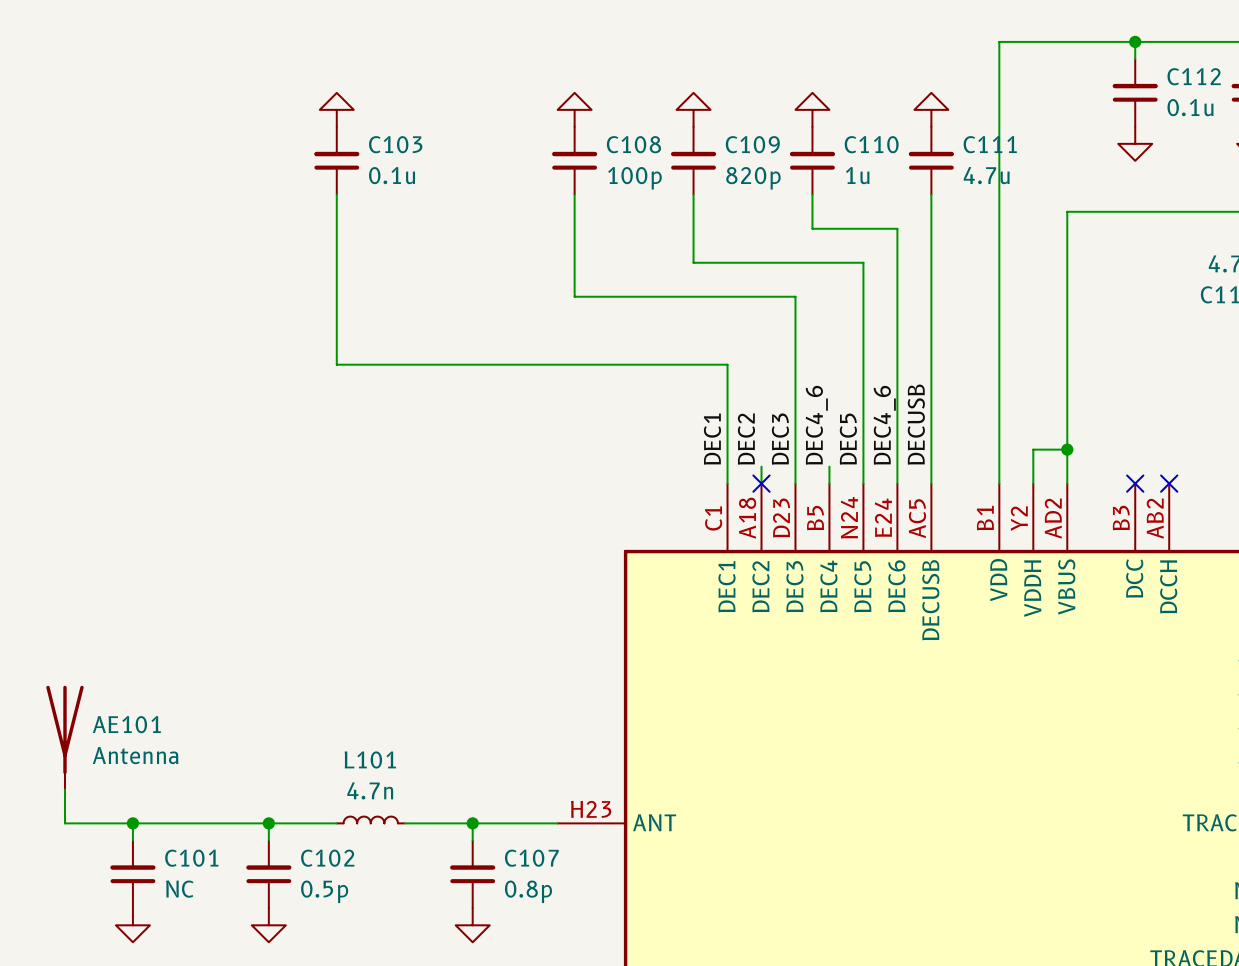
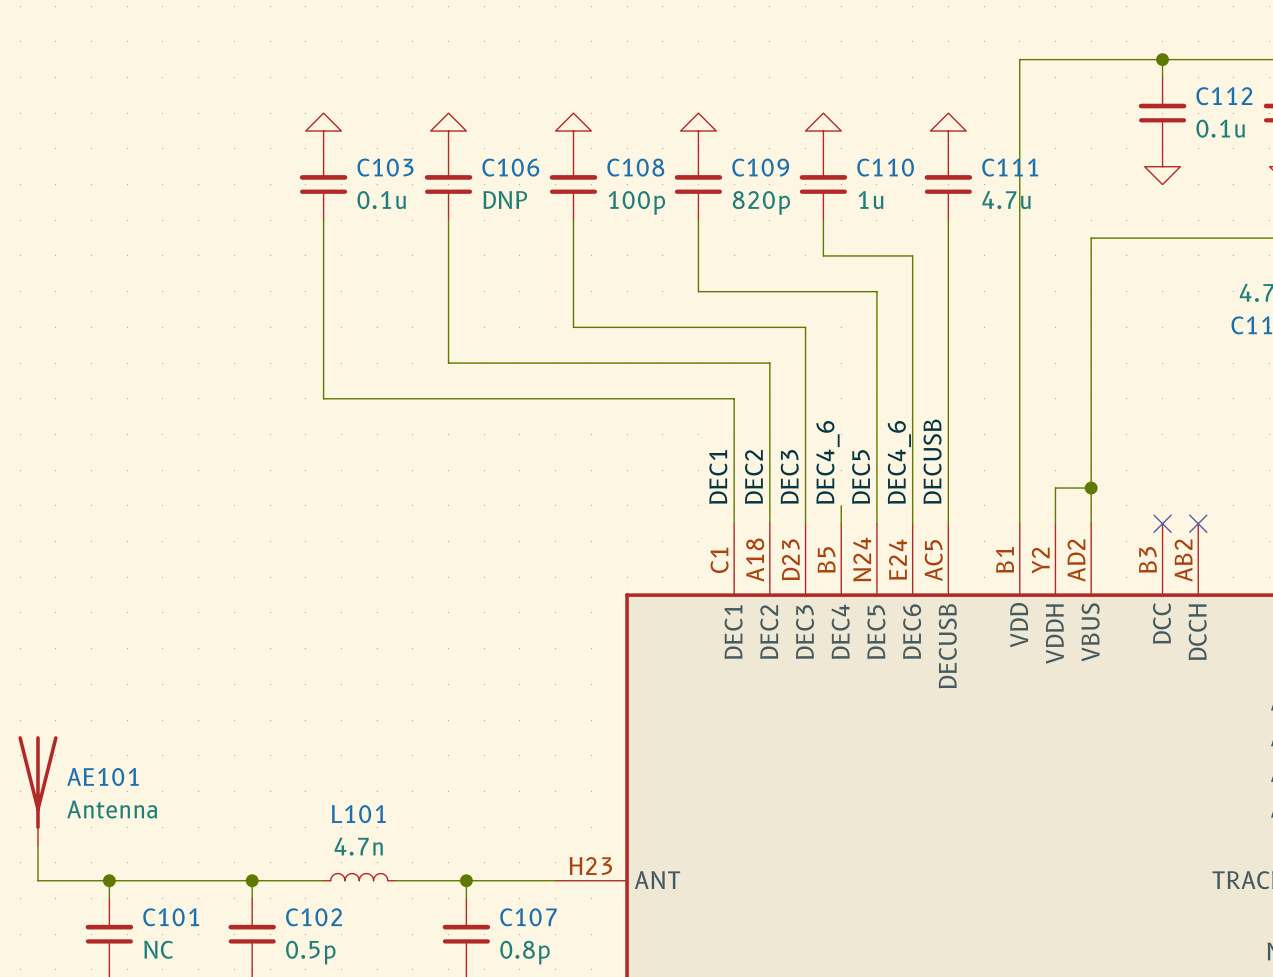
power symbol: none -> (448, 131)
C106: none -> DNP (448, 184)
wire: none -> (448, 220) (448, 363) (769, 363) (769, 505)
no-connect mark: (761, 483) -> none

